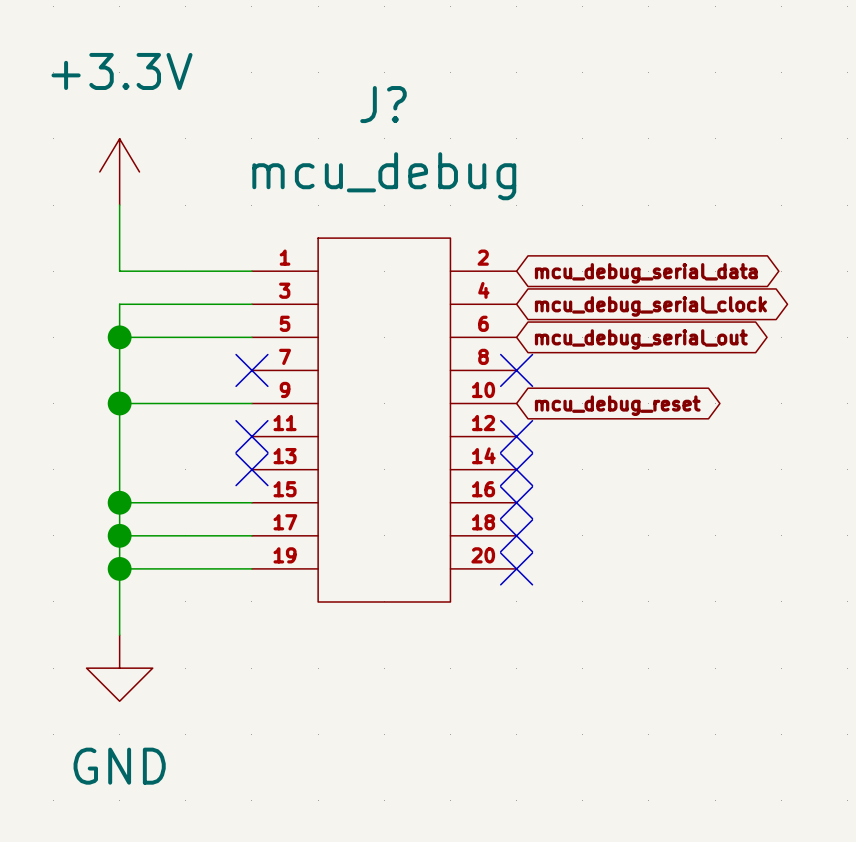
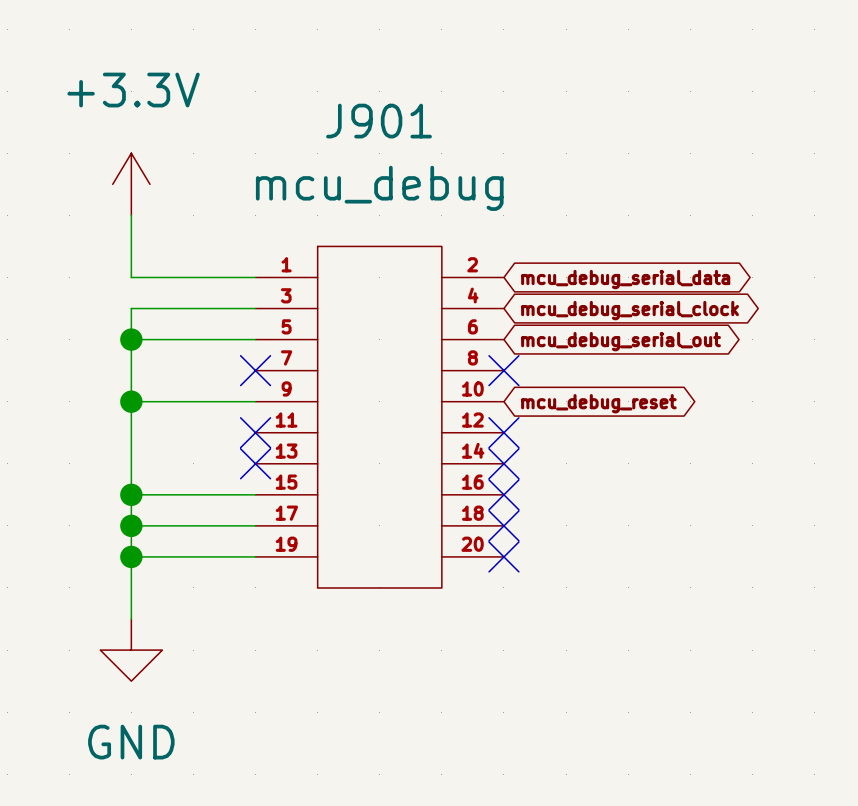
J? name: J? (383, 104) -> J901 (379, 121)

